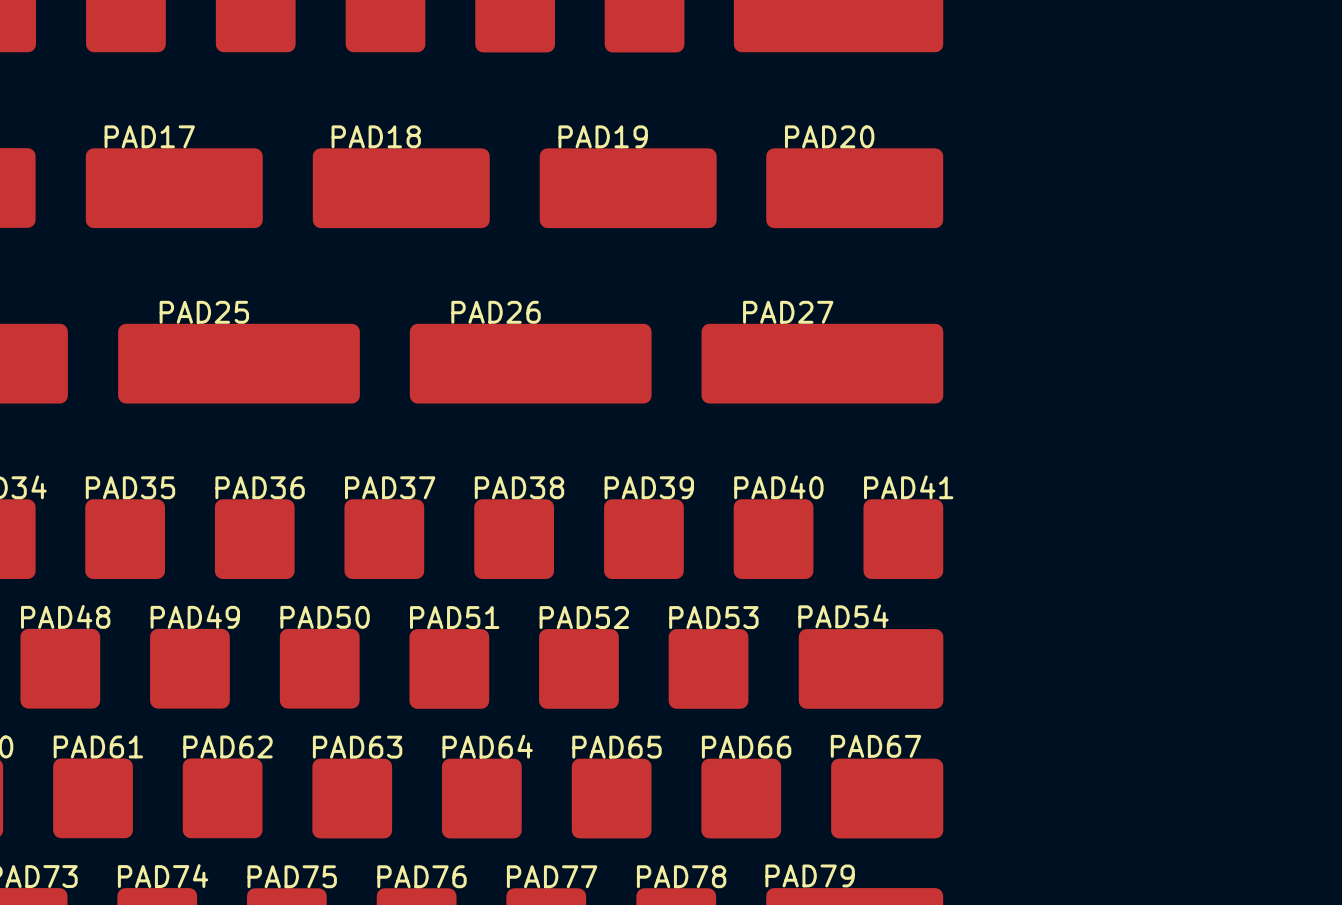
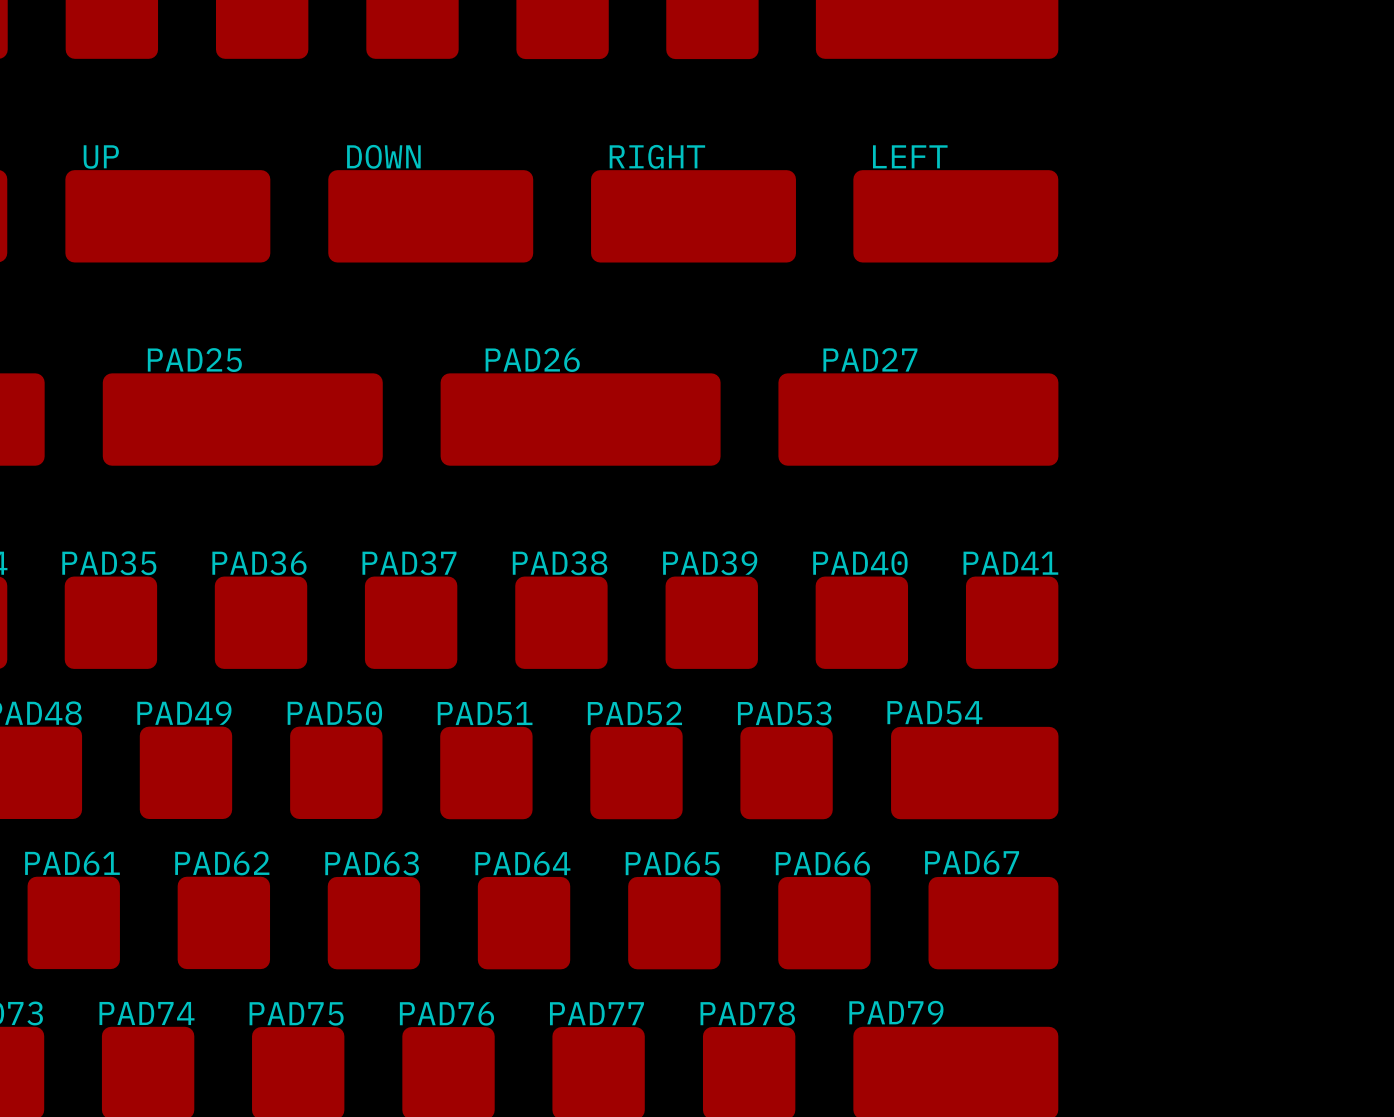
PAD17 name: PAD17 (149, 136) -> UP (101, 156)
PAD18 name: PAD18 (376, 136) -> DOWN (383, 156)
PAD19 name: PAD19 (603, 136) -> RIGHT (657, 156)
PAD20 name: PAD20 (829, 136) -> LEFT (910, 156)

